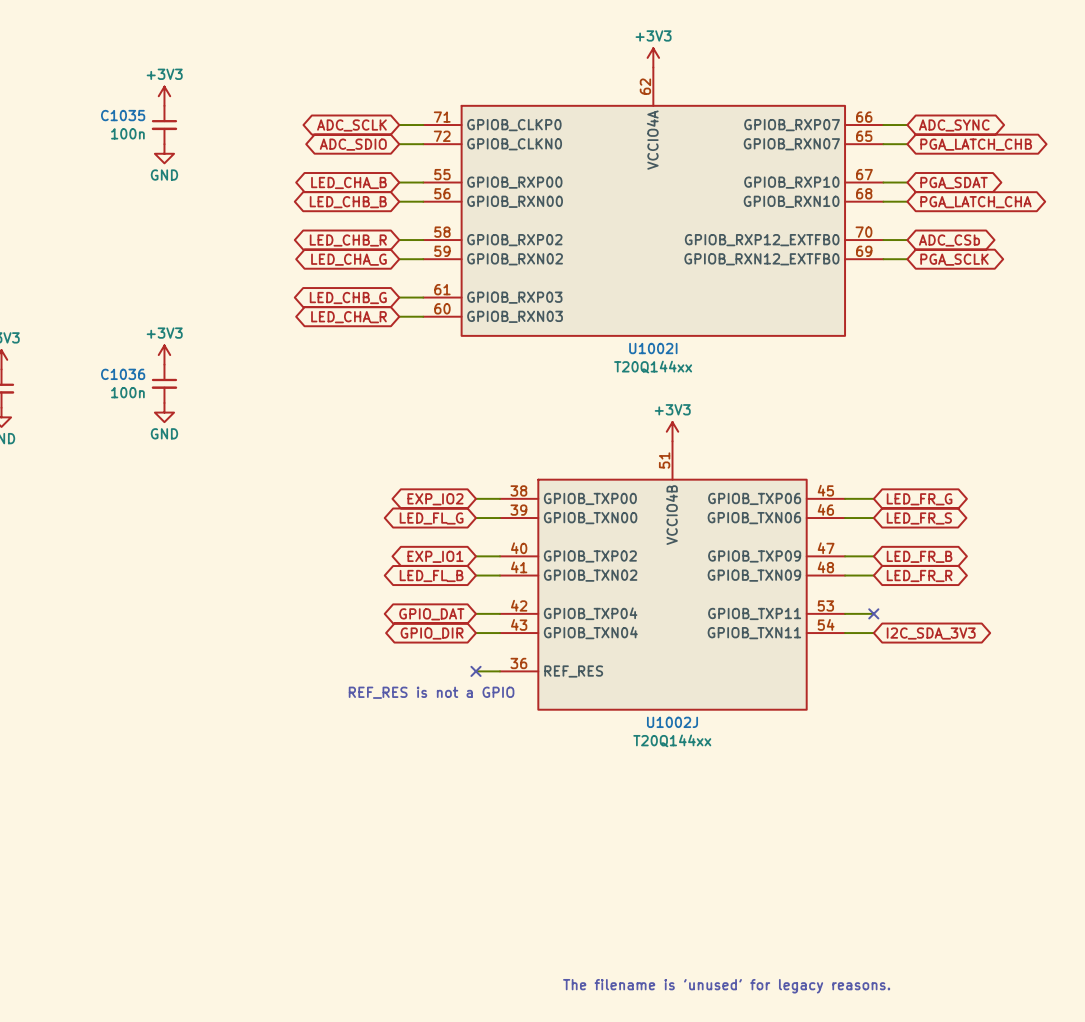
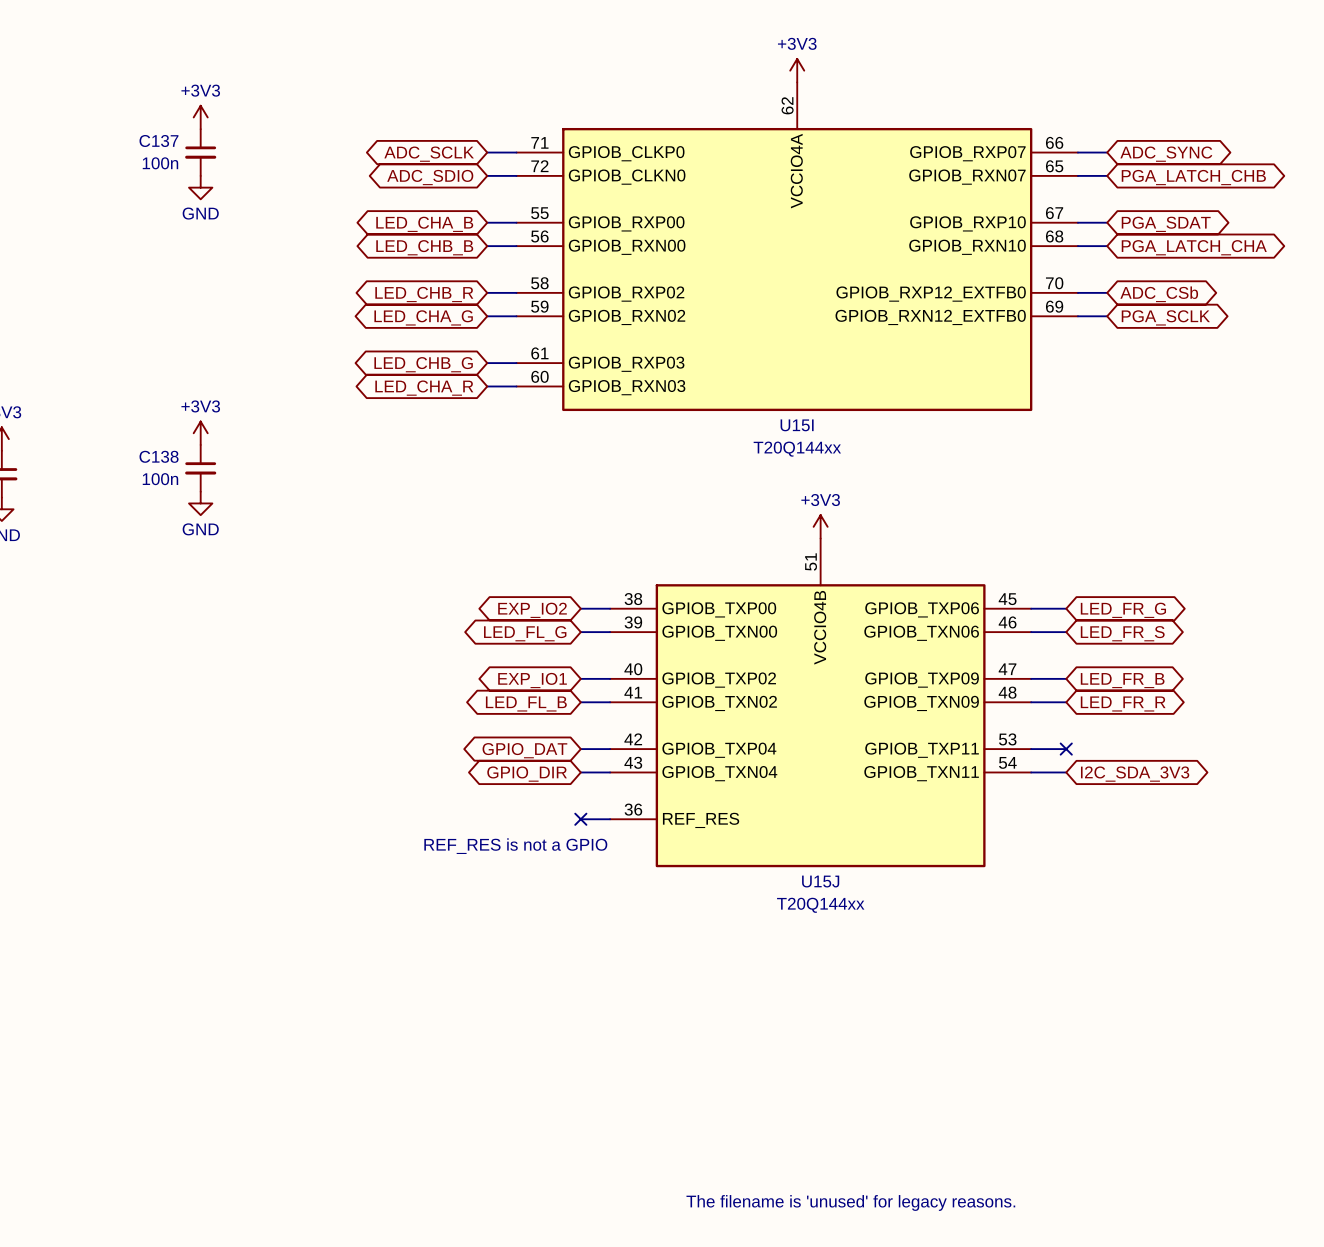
C1035 name: C1035 (123, 115) -> C137 (158, 140)
U1002I name: U1002I (653, 348) -> U15I (797, 425)
C1036 name: C1036 (123, 374) -> C138 (159, 456)
U1002J name: U1002J (672, 722) -> U15J (820, 881)

